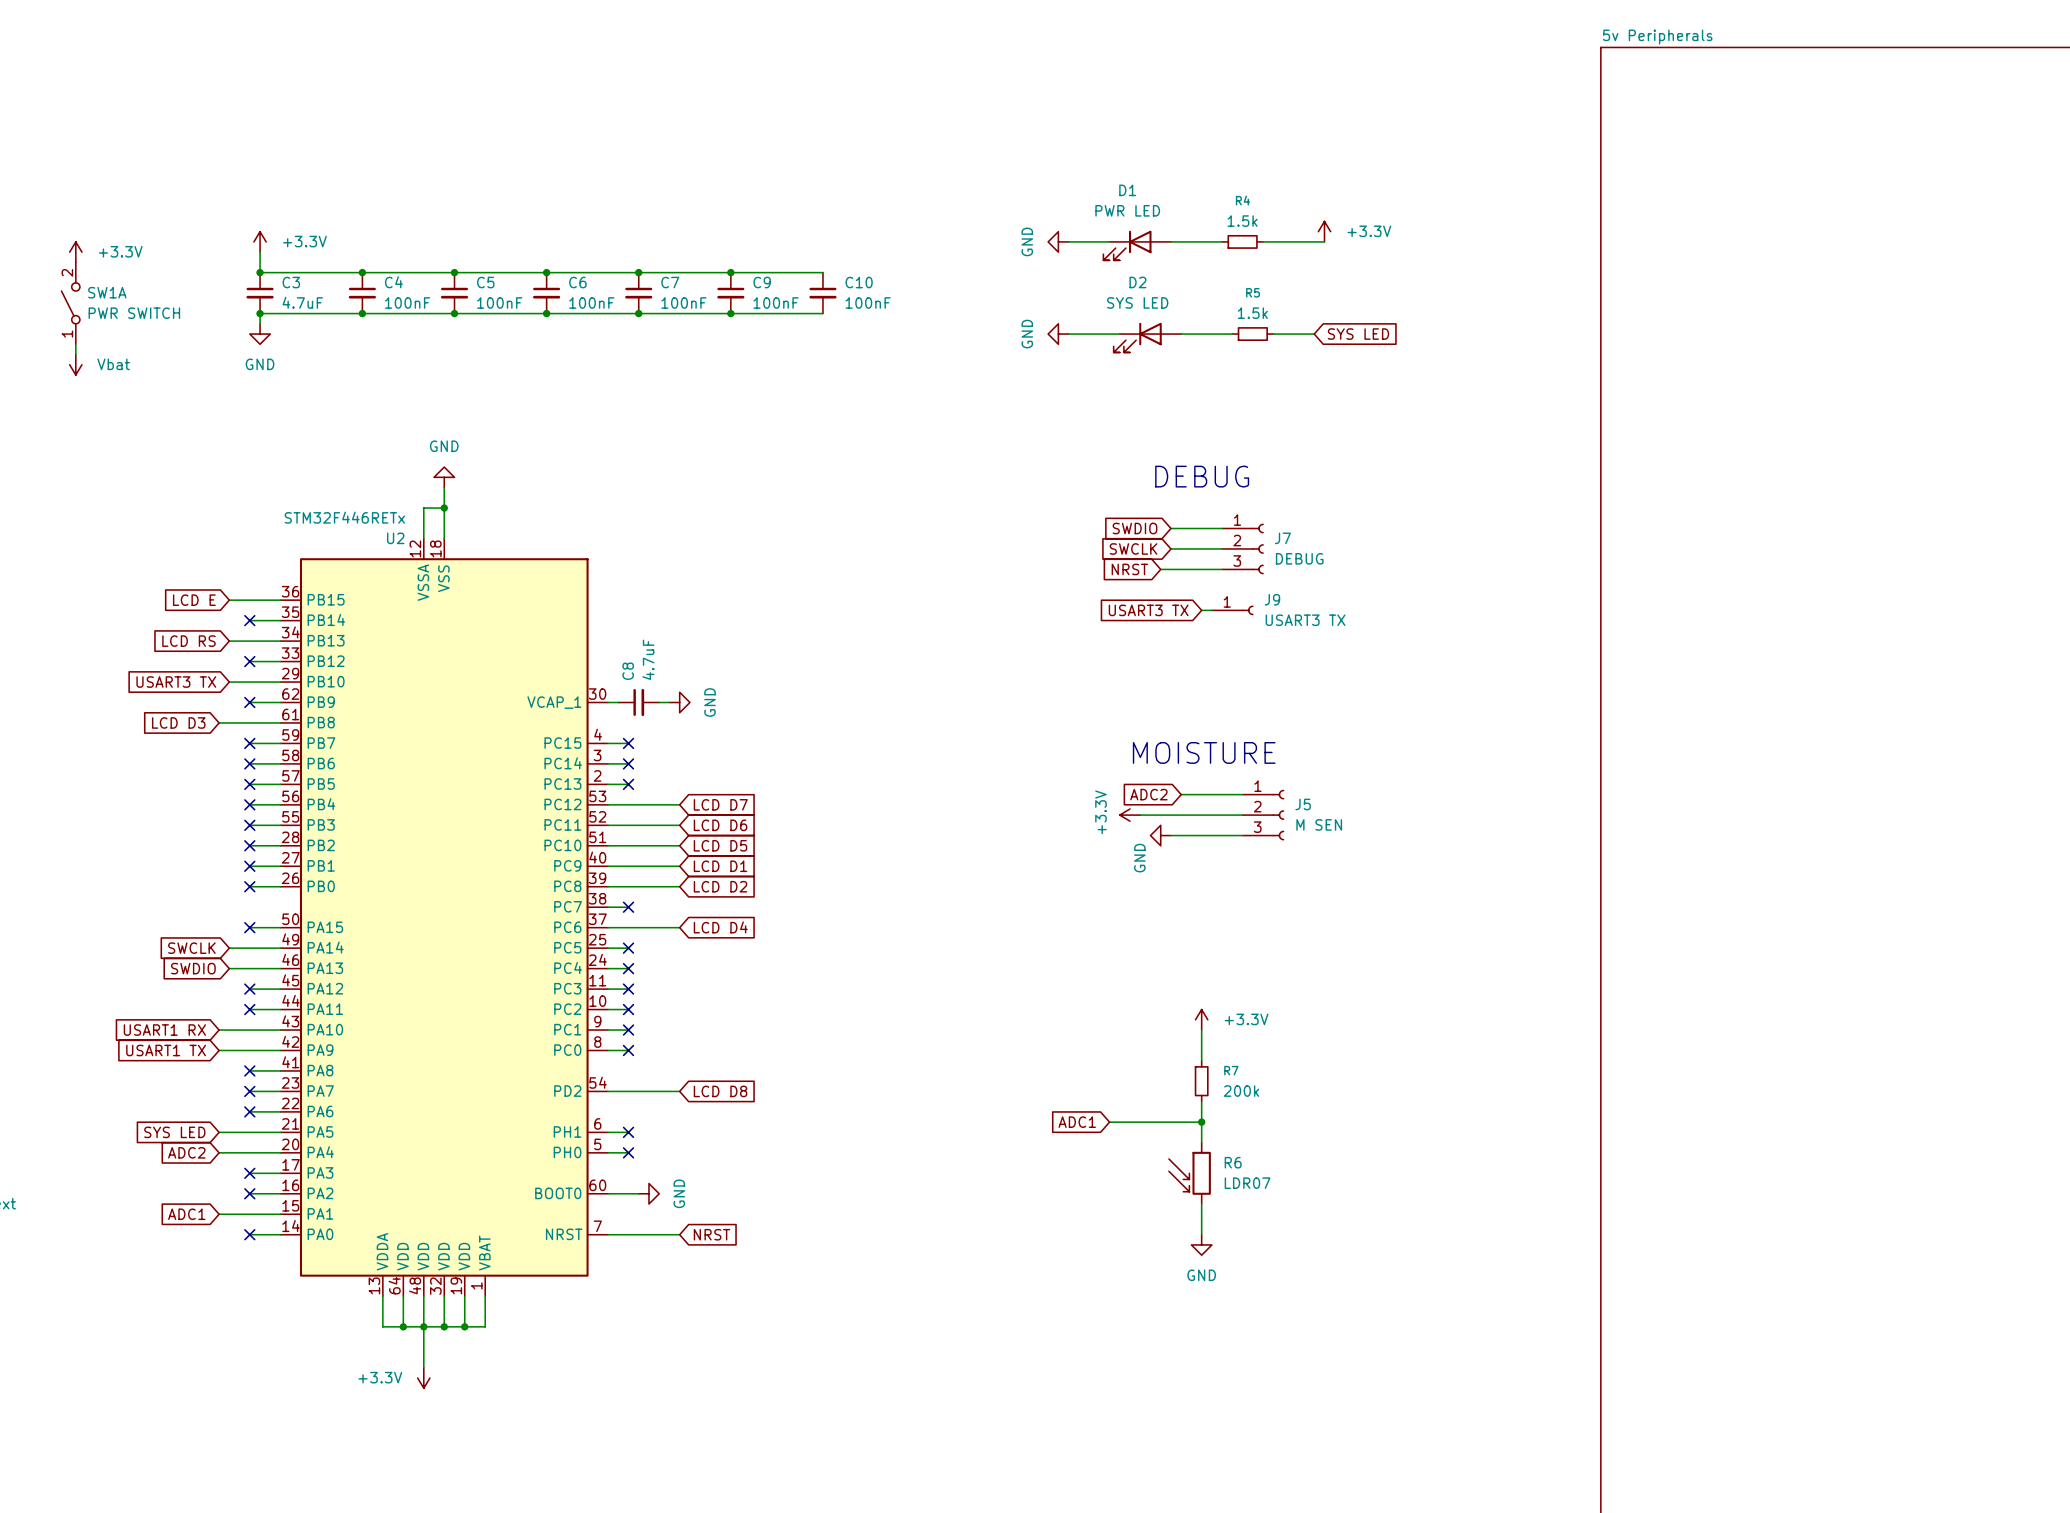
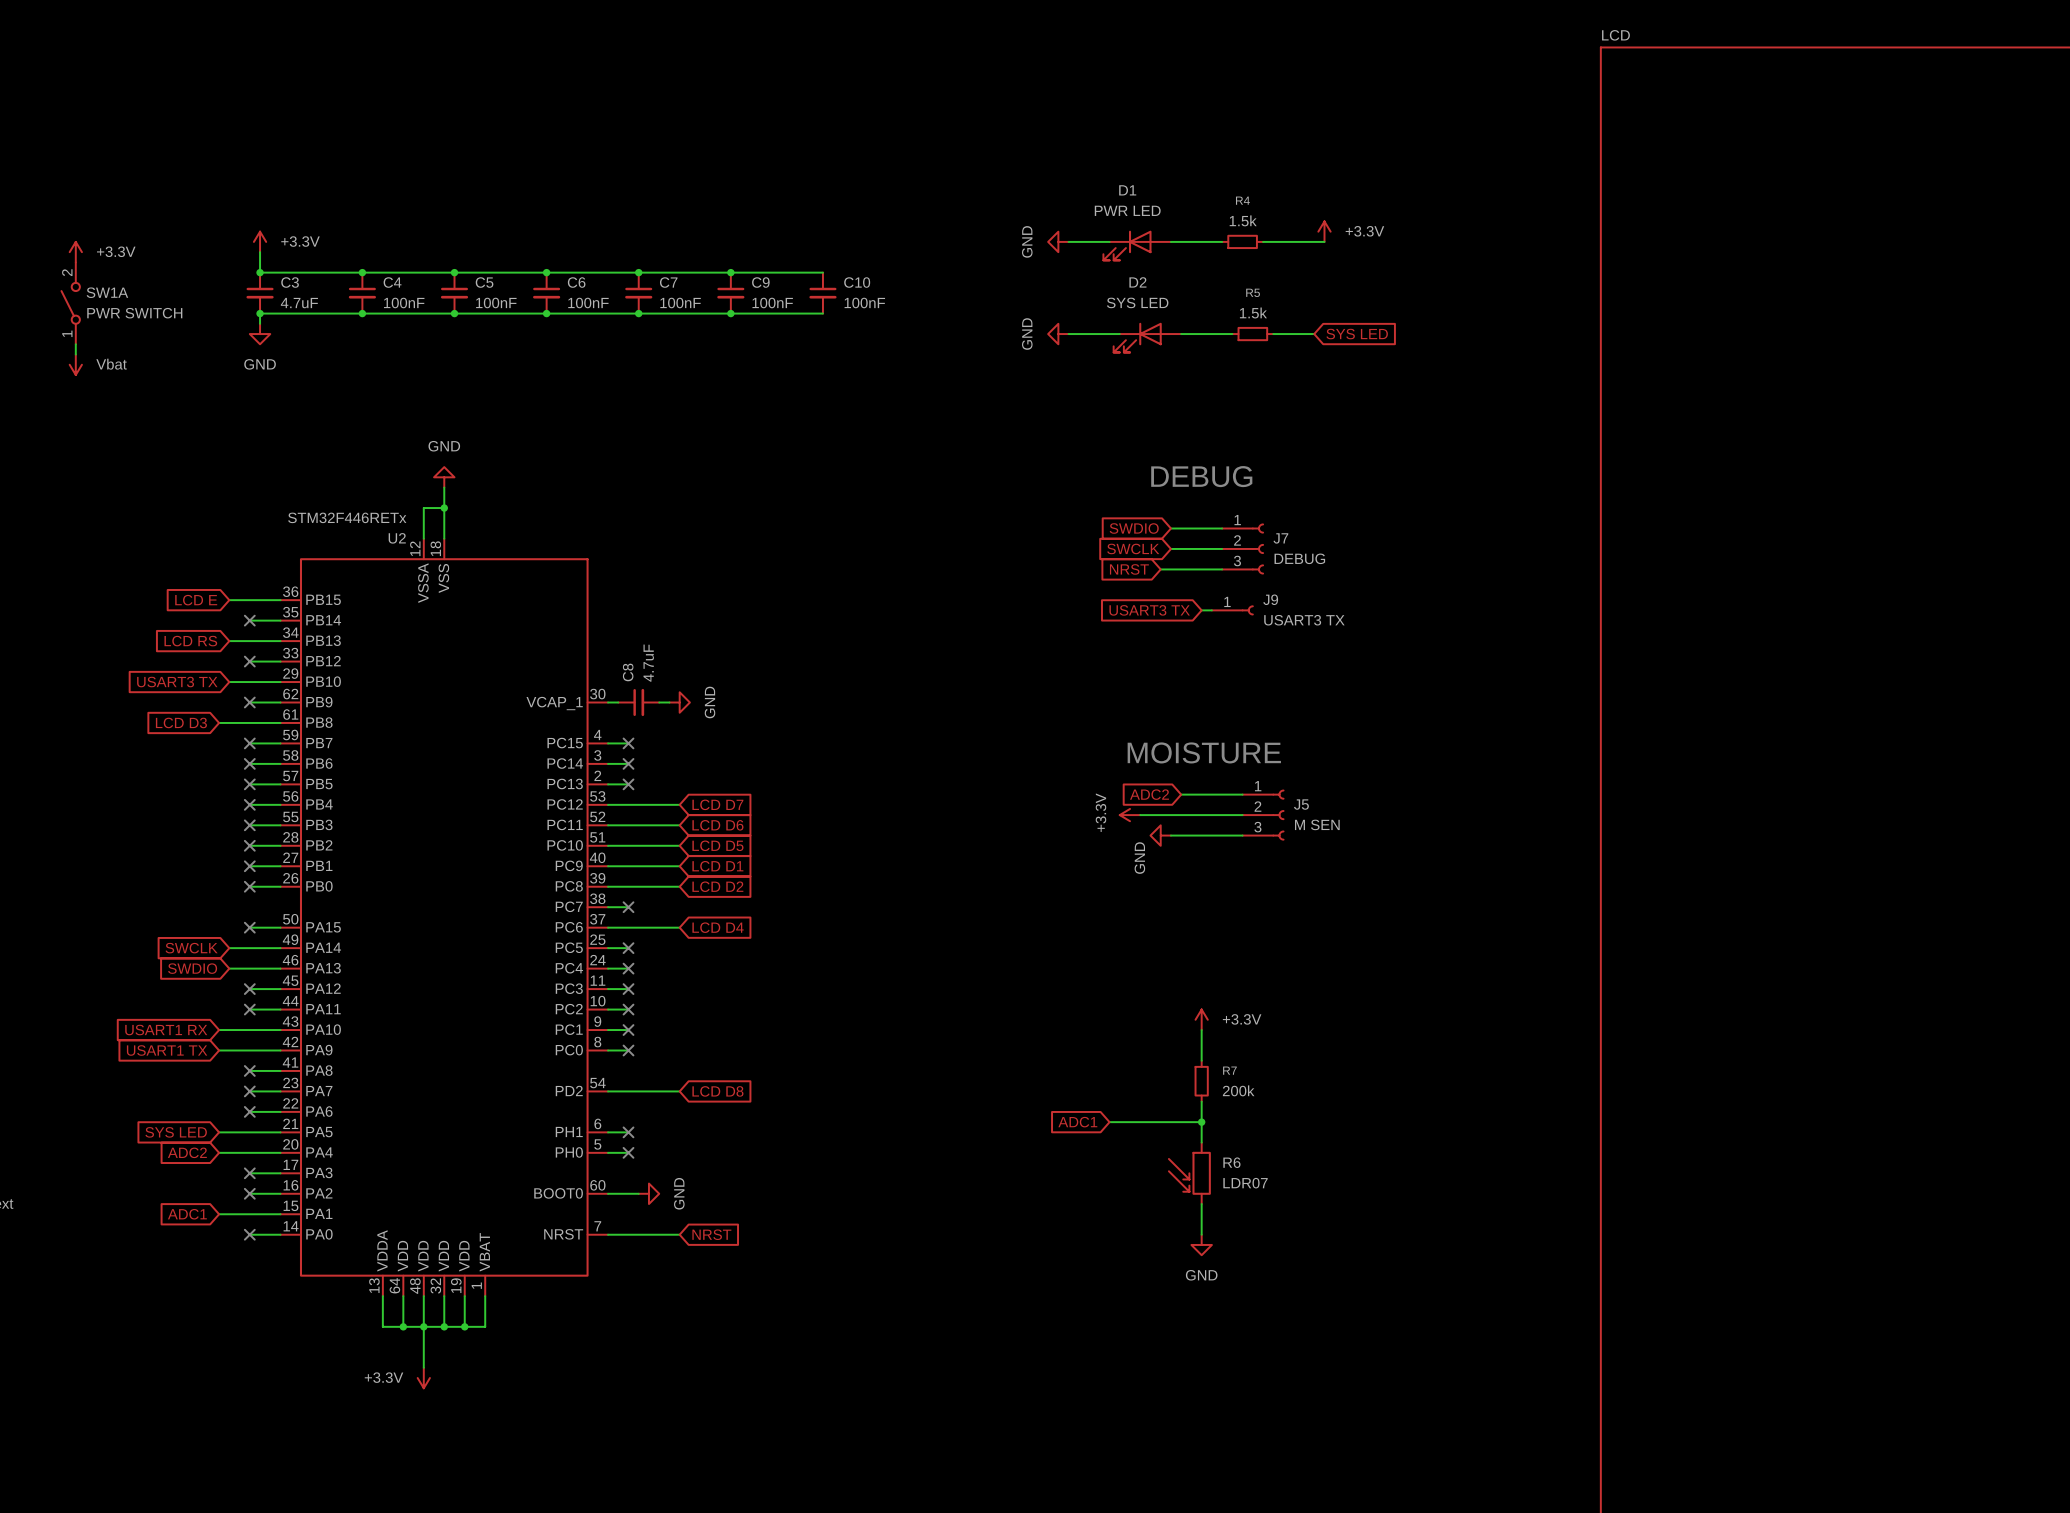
sheet 5v Peripherals name: 5v Peripherals (1657, 37) -> LCD (1615, 35)

